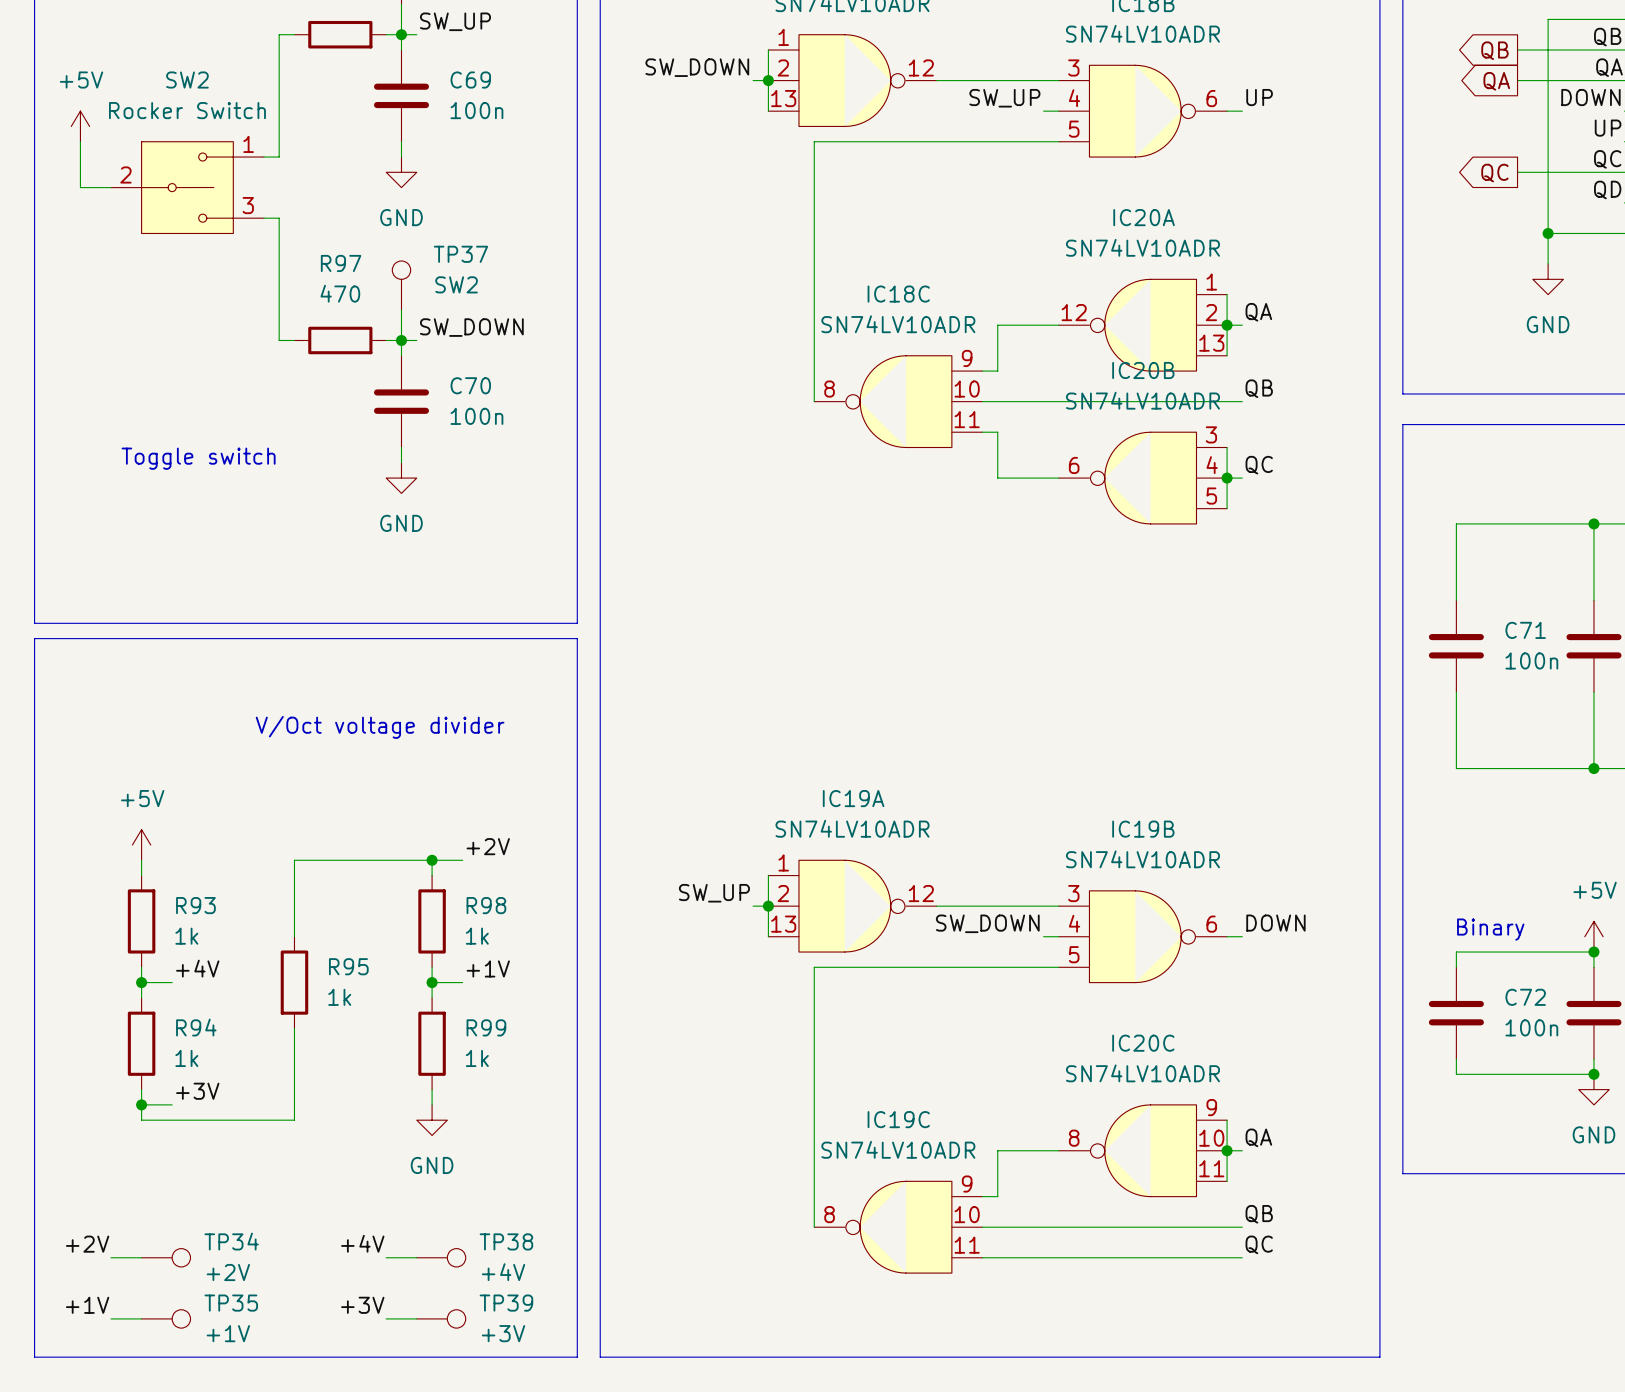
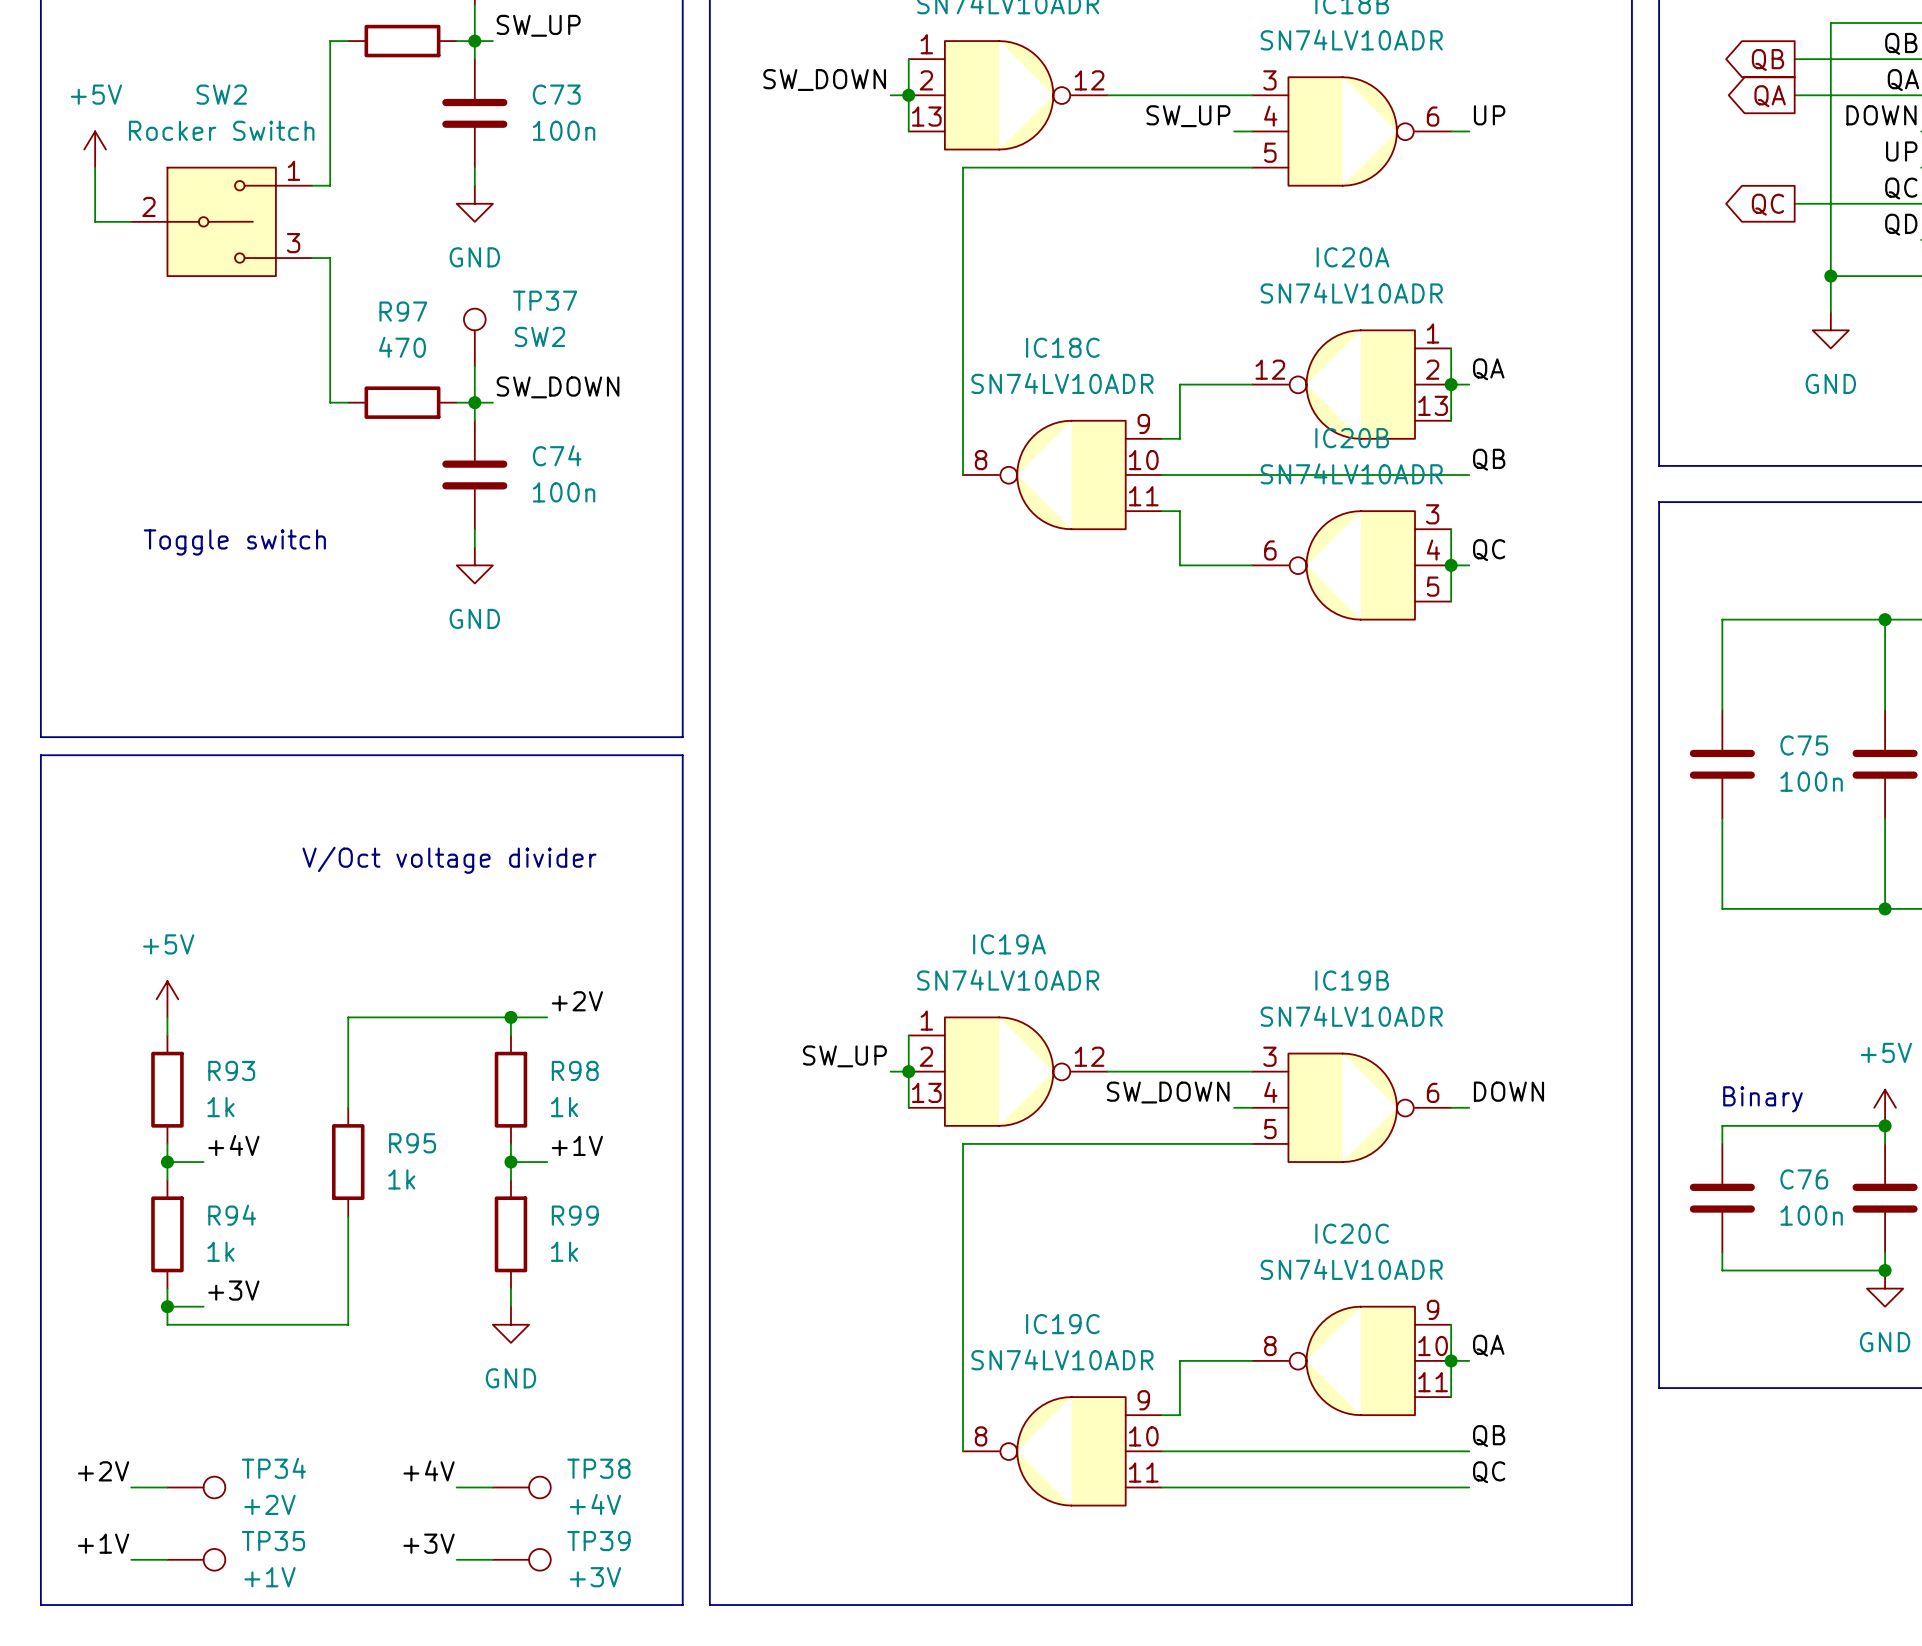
C69 name: C69 (470, 80) -> C73 (556, 94)
C70 name: C70 (470, 385) -> C74 (557, 455)
C71 name: C71 (1525, 630) -> C75 (1804, 745)
C72 name: C72 (1525, 997) -> C76 (1804, 1179)

